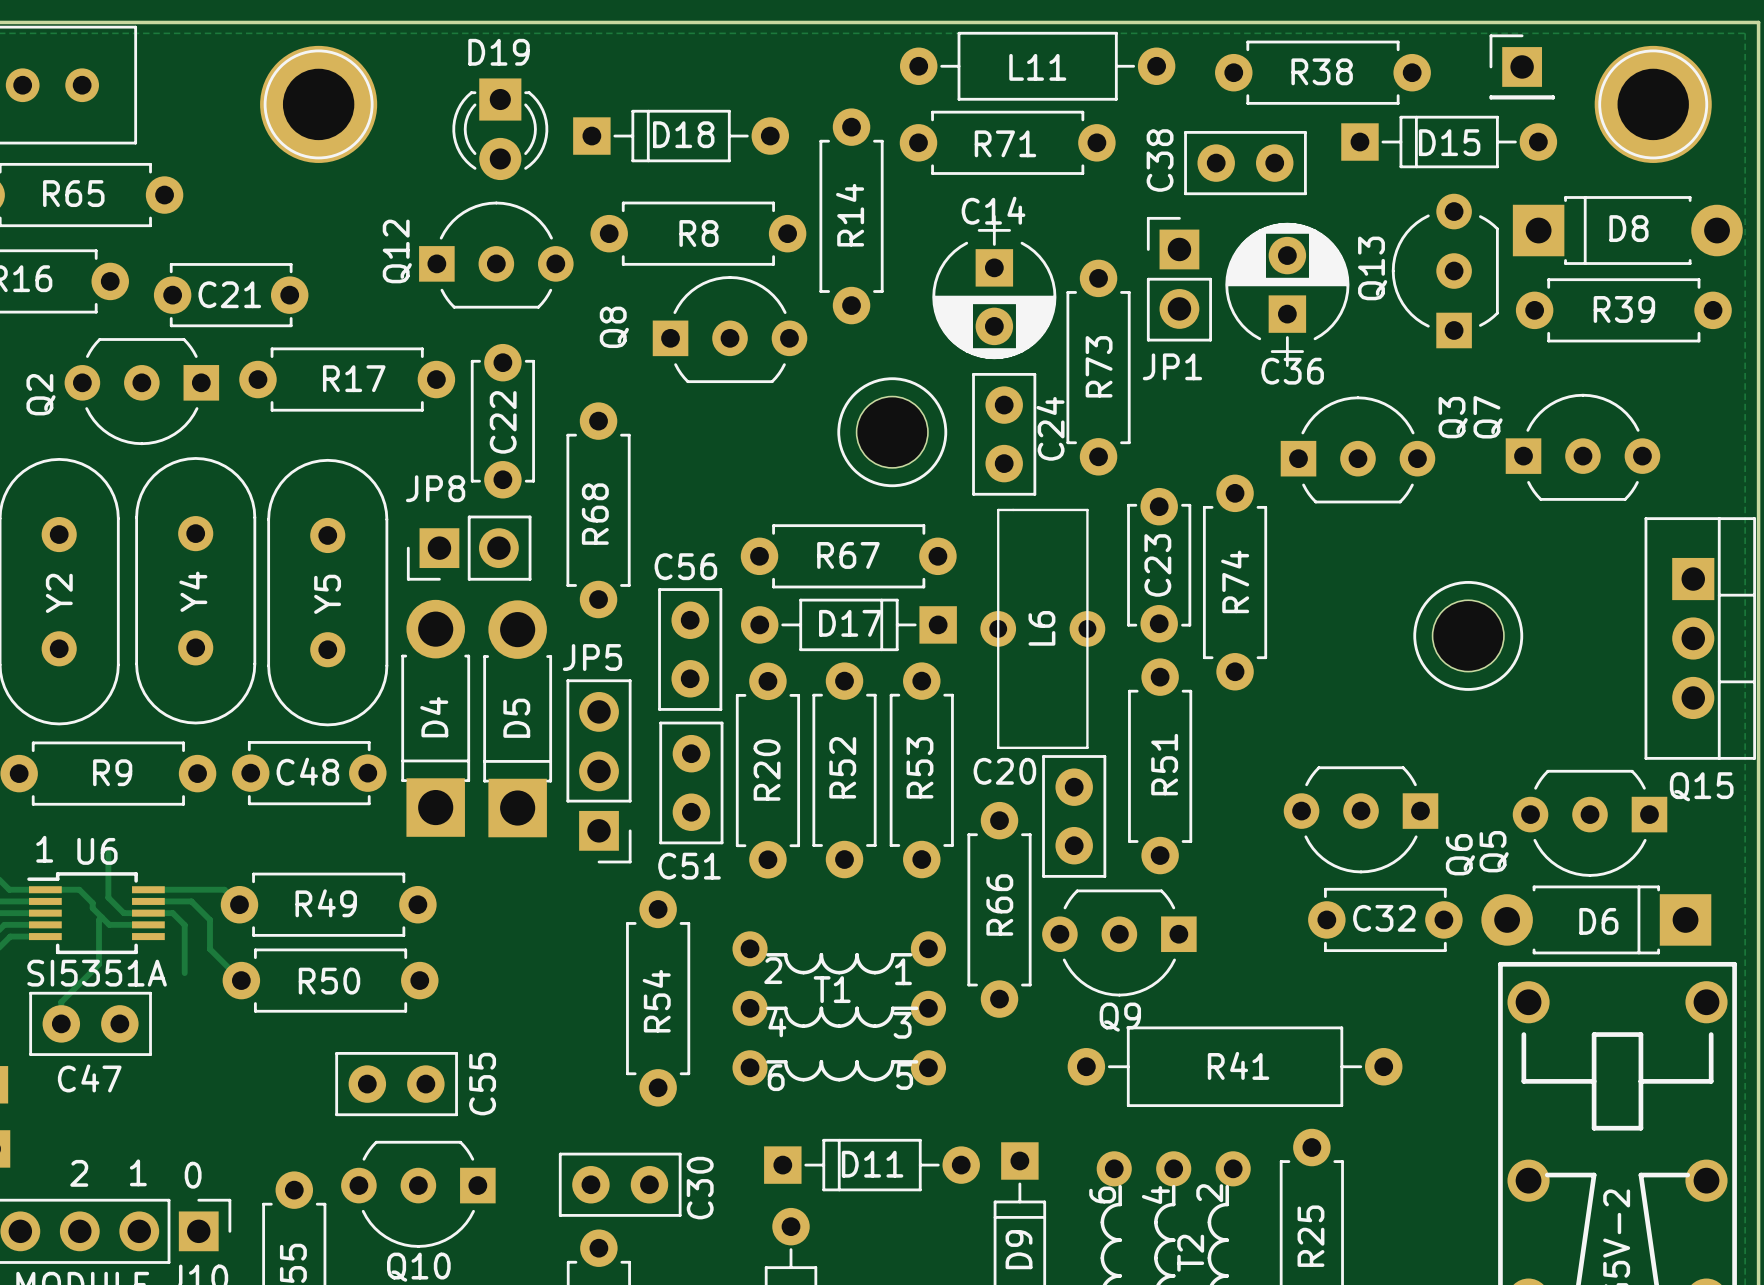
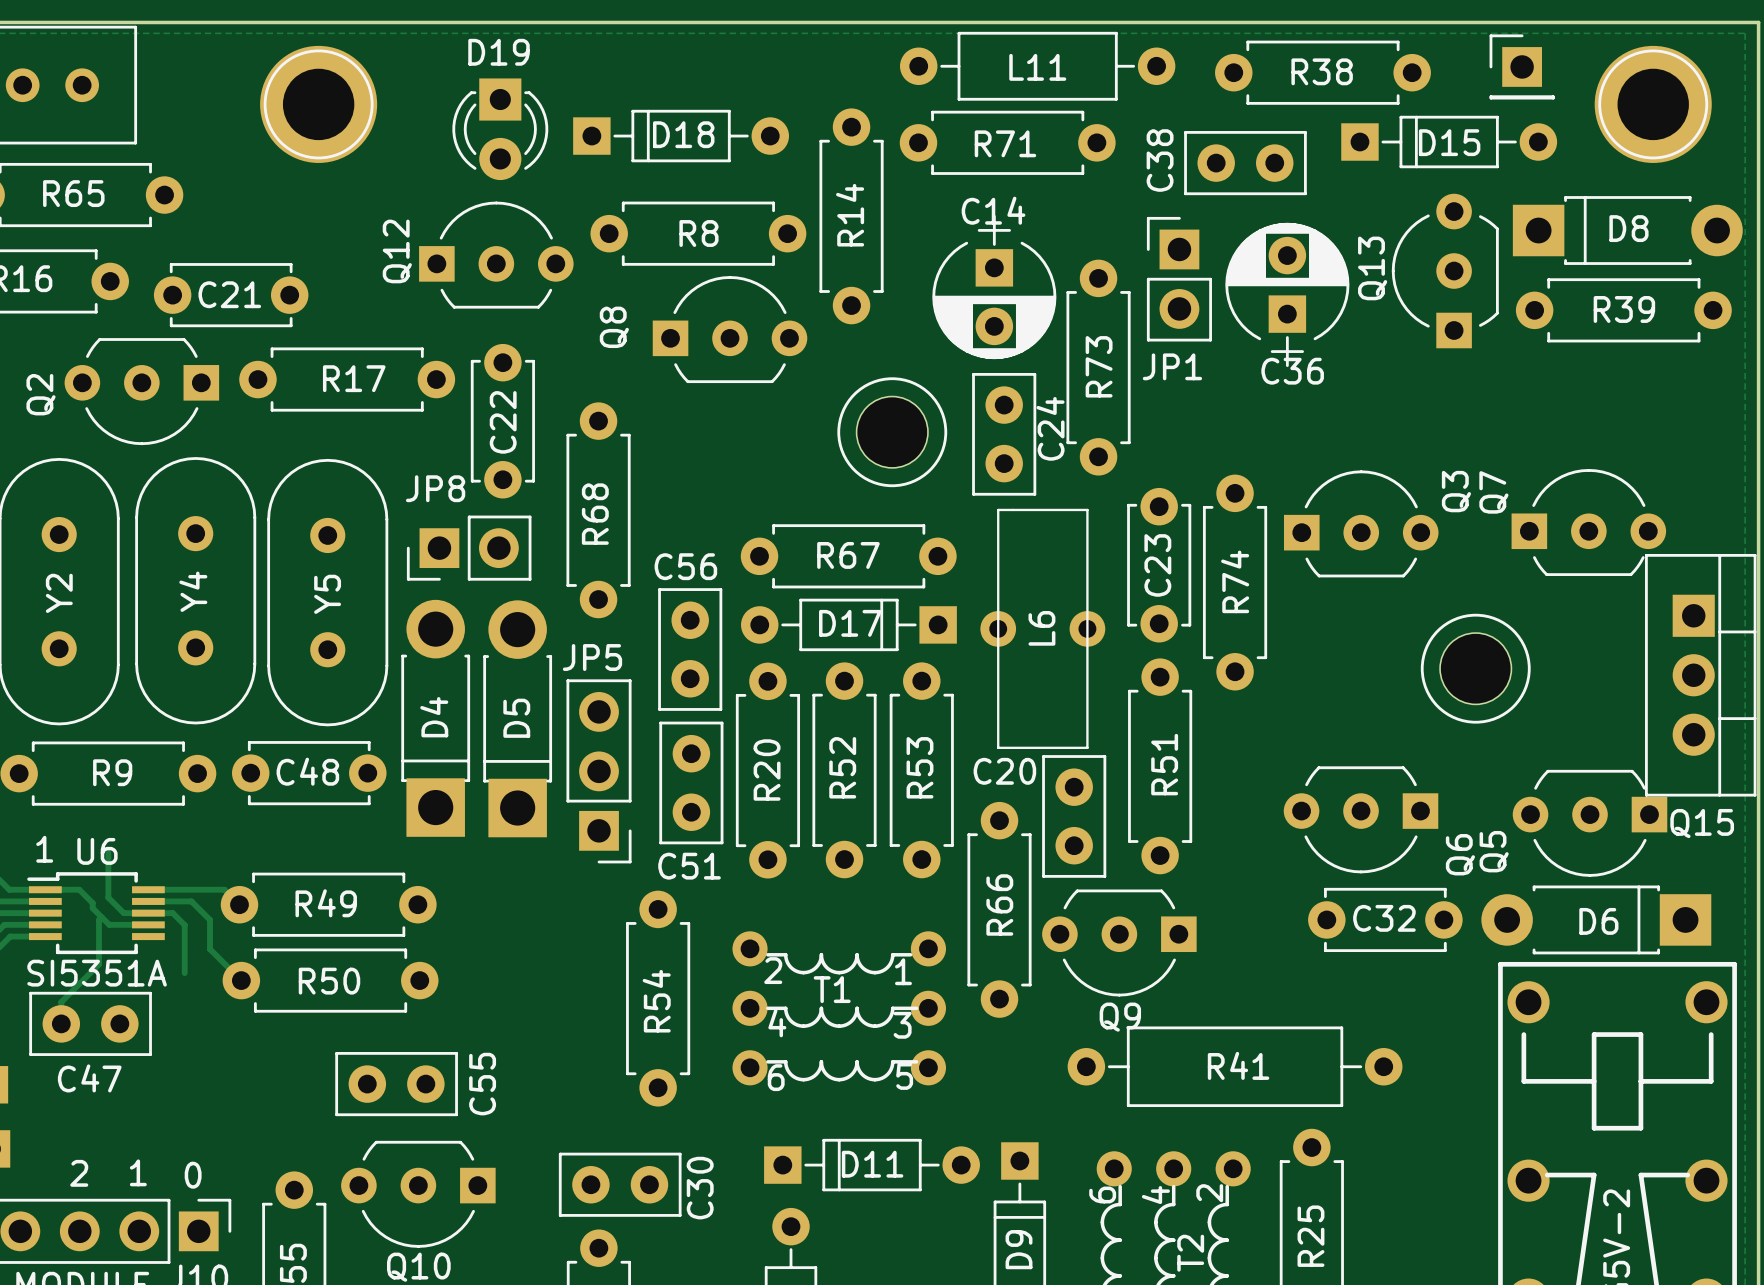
Q7 position: (1582, 447) -> (1588, 522)
Q3 position: (1357, 449) -> (1361, 523)
part position: (1468, 635) -> (1475, 668)
Q15 position: (1700, 638) -> (1700, 675)

